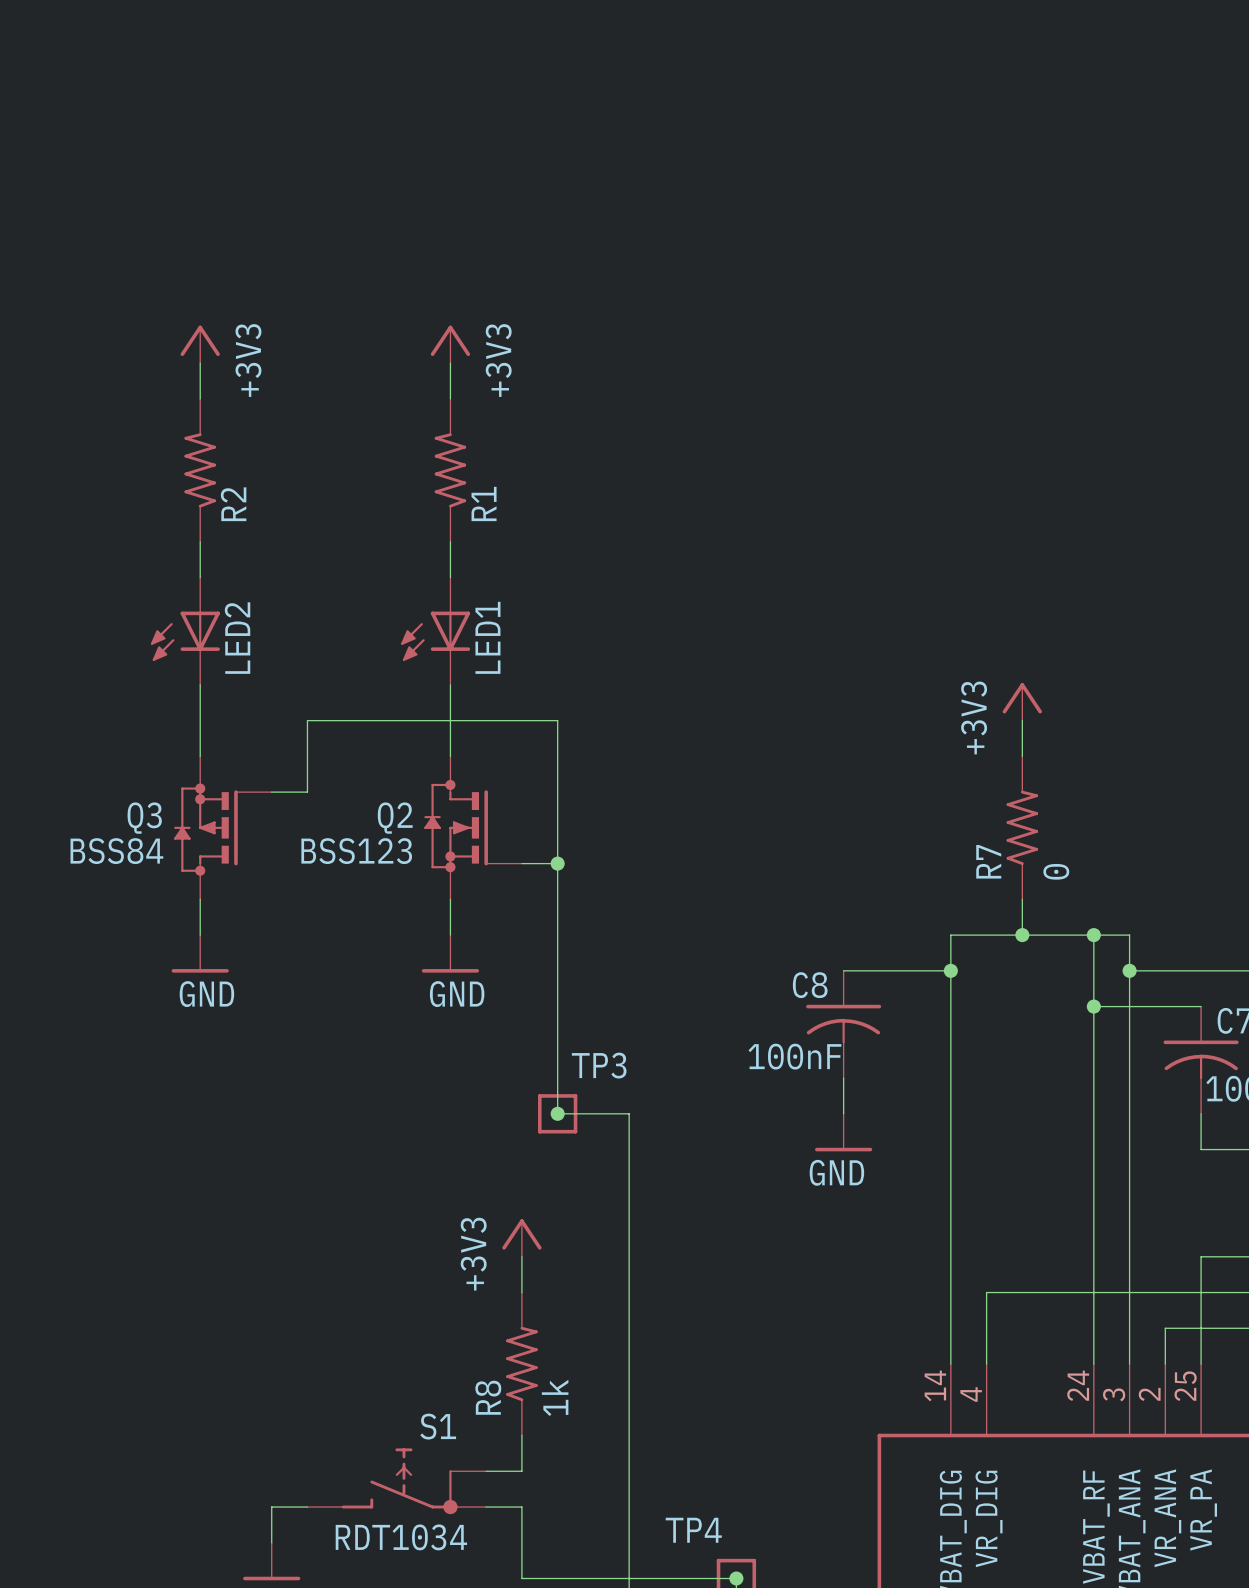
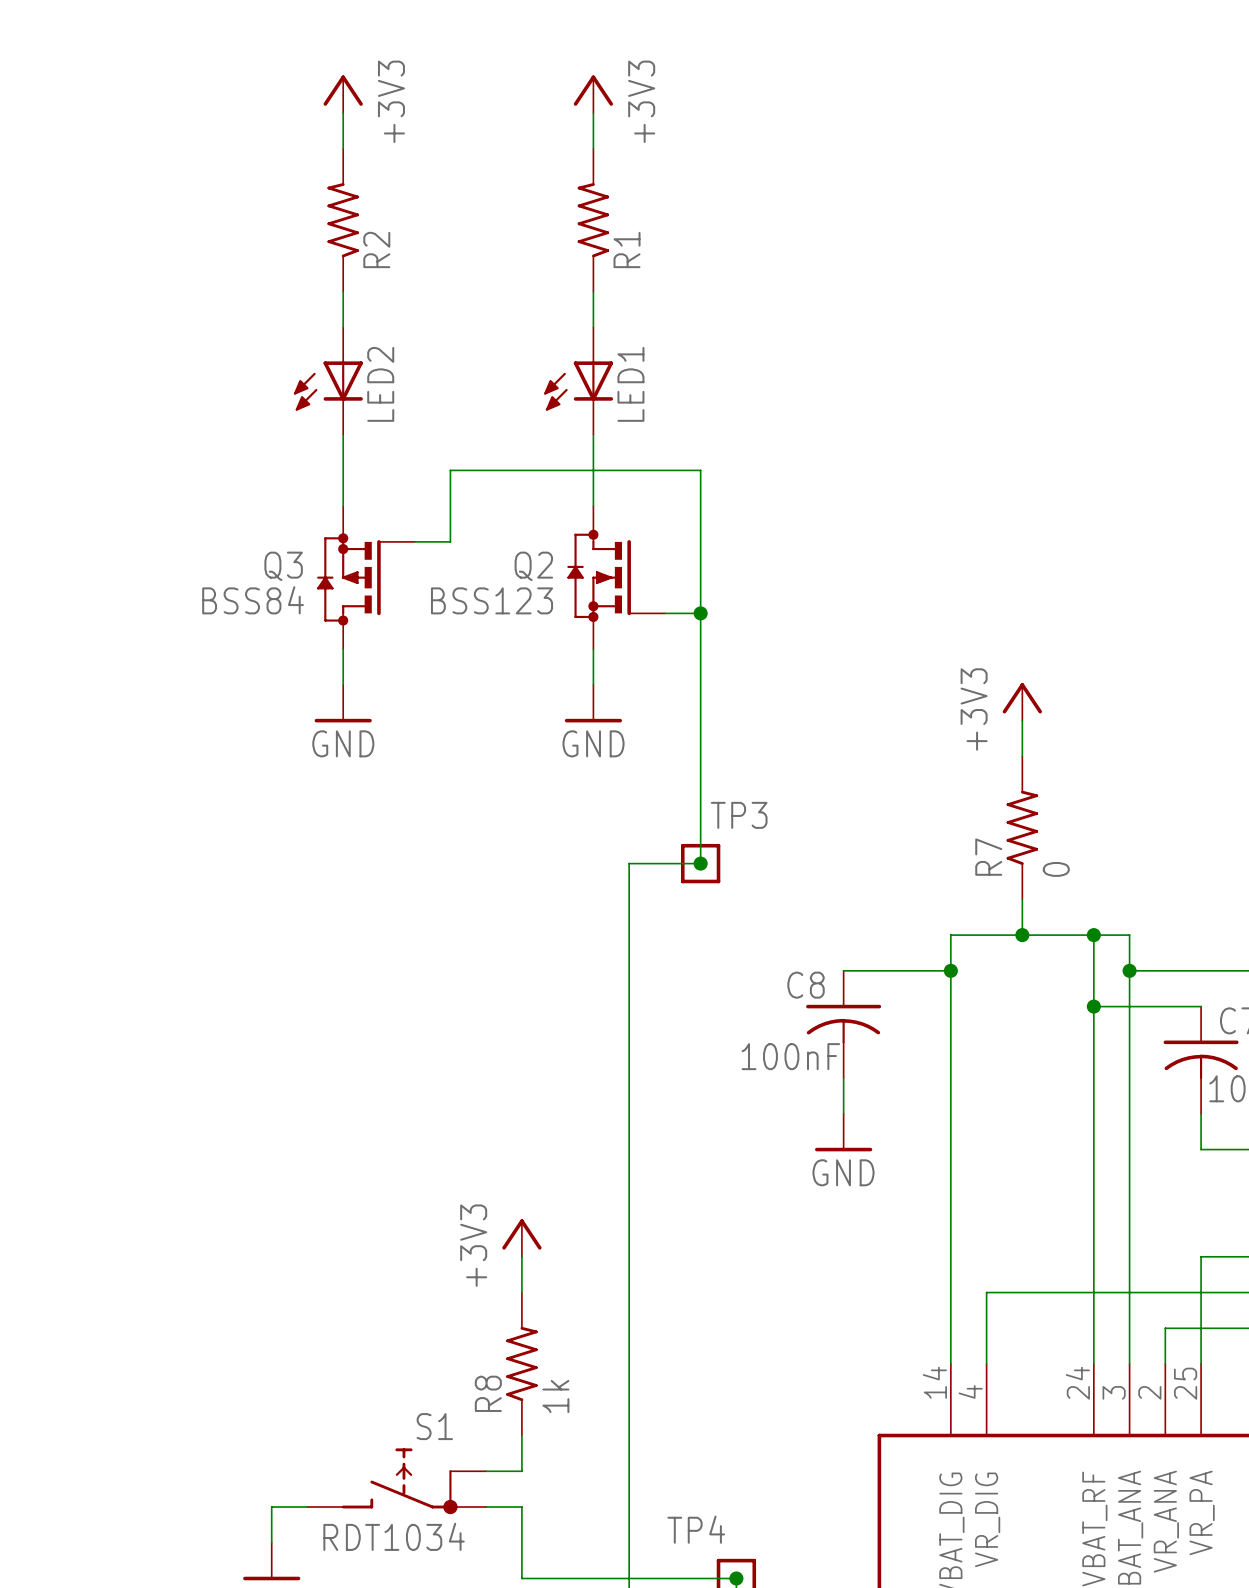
power symbol: none -> +3V3 (343, 94)
power symbol: none -> +3V3 (593, 94)
power symbol: +3V3 (200, 344) -> none
power symbol: +3V3 (450, 344) -> none
wire: (200, 363) (200, 398) -> (343, 112) (343, 148)
wire: (450, 363) (450, 398) -> (593, 112) (593, 148)
R2 position: (200, 470) -> (343, 220)
R1 position: (450, 470) -> (593, 220)
wire: (200, 541) (200, 577) -> (343, 291) (343, 327)
wire: (450, 541) (450, 577) -> (593, 291) (593, 327)
junction: none -> (700, 613)
LED2 position: (185, 631) -> (328, 381)
LED1 position: (435, 631) -> (578, 381)
wire: (200, 684) (200, 756) -> (343, 434) (343, 506)
wire: (450, 684) (450, 756) -> (593, 434) (593, 506)
power symbol: none -> GND (343, 703)
power symbol: none -> GND (593, 703)
wire: (271, 792) (307, 792) (307, 720) (557, 720) (557, 1113) (629, 1113) -> (414, 541) (450, 541) (450, 470) (700, 470) (700, 863) (629, 863) (629, 1113)
Q3 position: (222, 827) -> (365, 577)
Q2 position: (473, 827) -> (616, 577)
wire: (521, 863) (557, 863) -> (664, 613) (700, 613)
junction: (557, 863) -> none
junction: none -> (700, 863)
wire: (200, 899) (200, 935) -> (343, 649) (343, 684)
wire: (450, 899) (450, 935) -> (593, 649) (593, 684)
power symbol: GND (200, 953) -> none
power symbol: GND (450, 953) -> none
TP3 position: (557, 1113) -> (700, 863)
junction: (557, 1113) -> none

